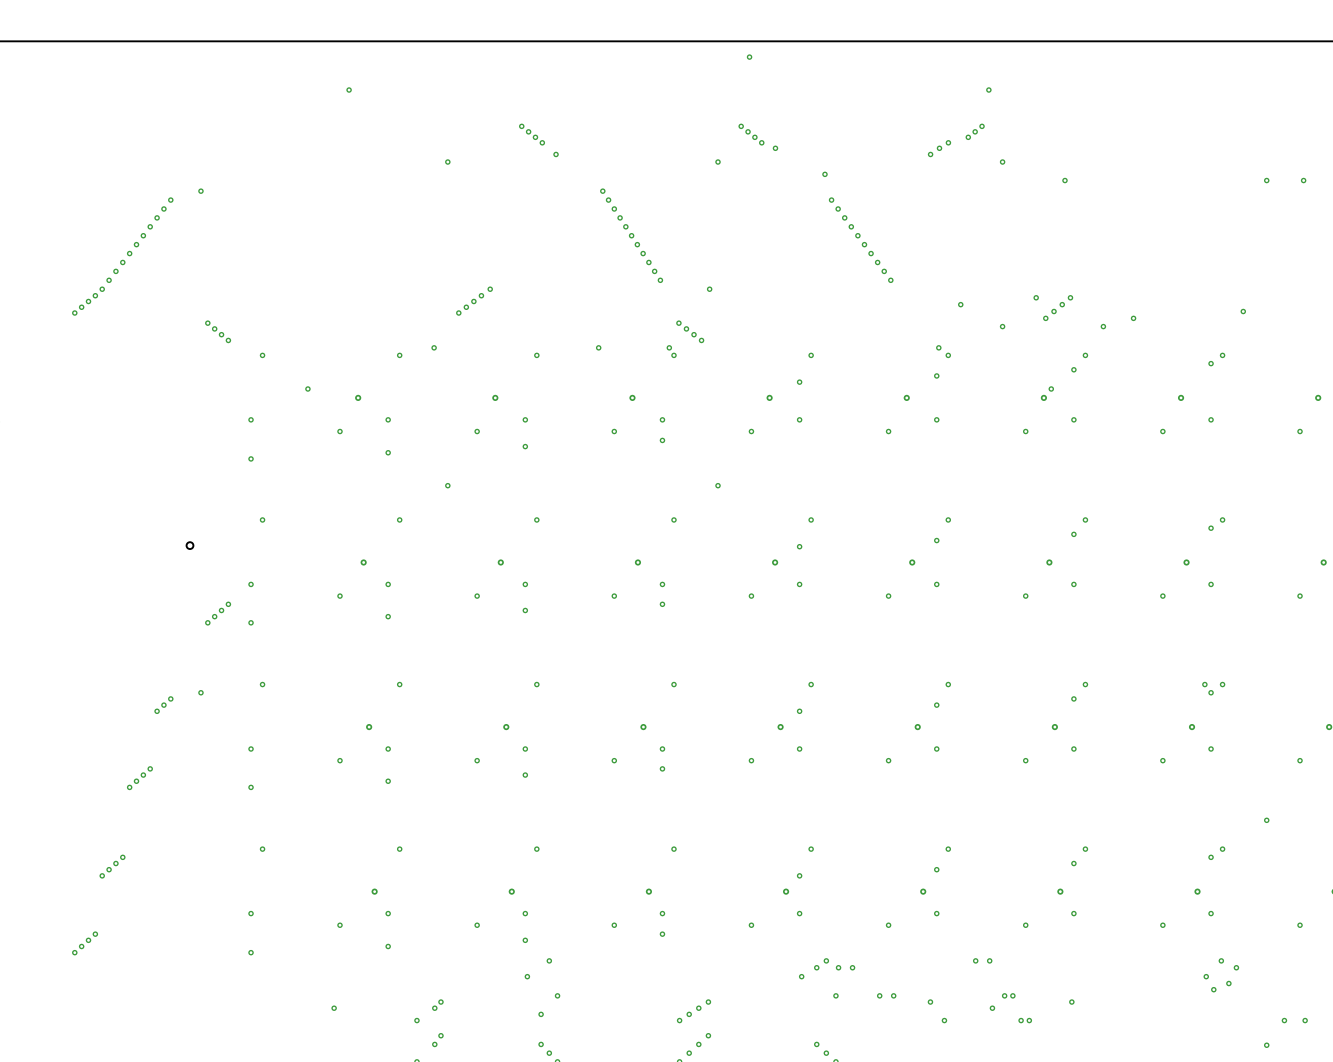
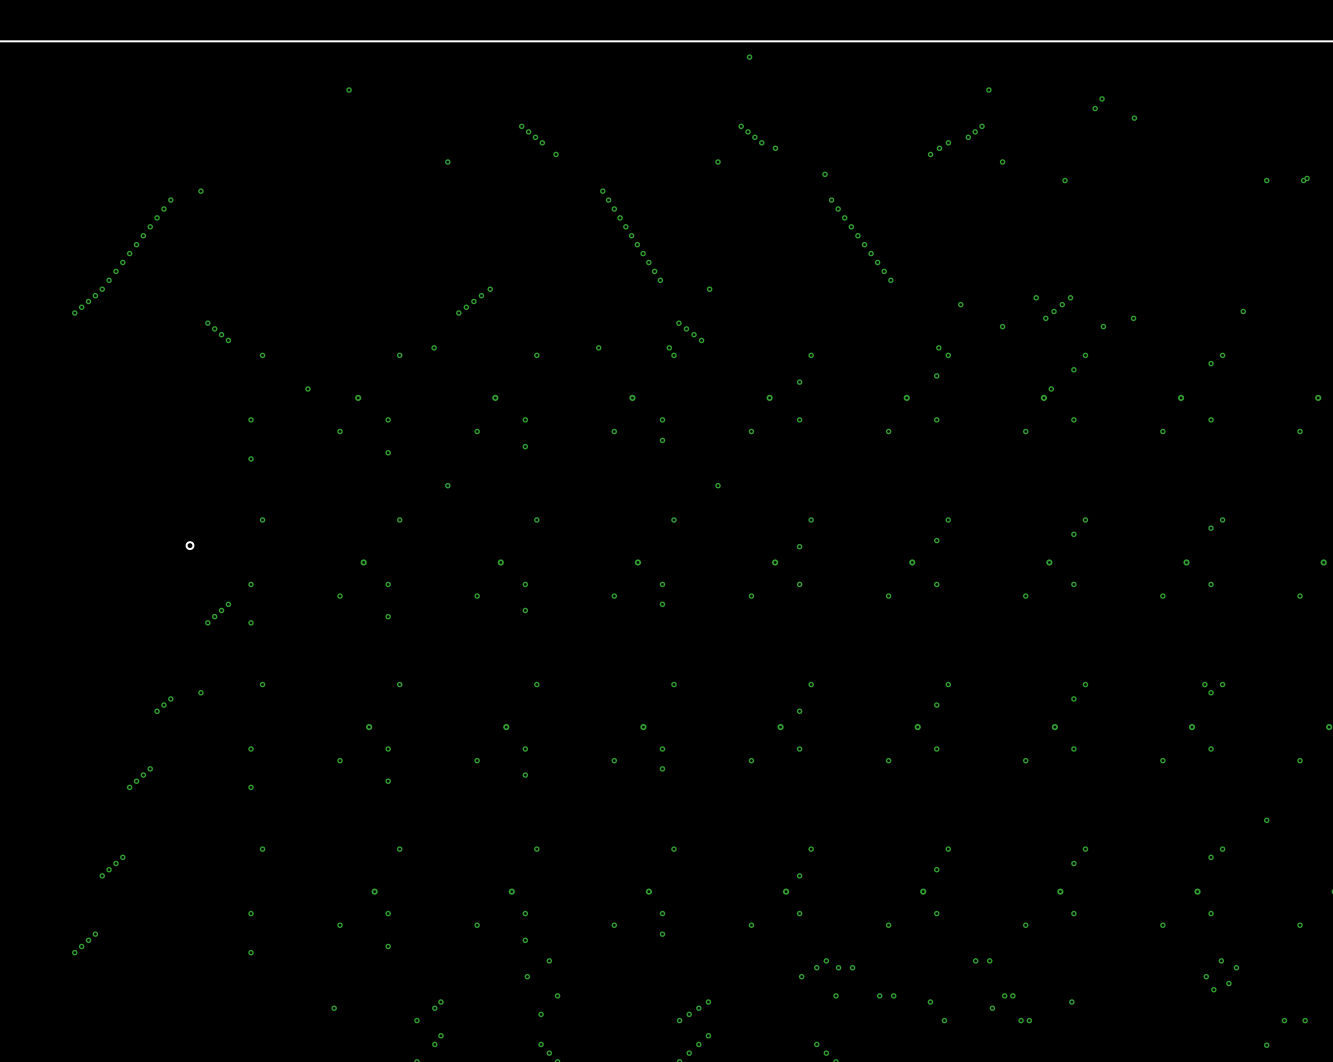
via: none -> (1102, 98)
via: none -> (1095, 108)
via: none -> (1134, 118)
via: none -> (1307, 178)

